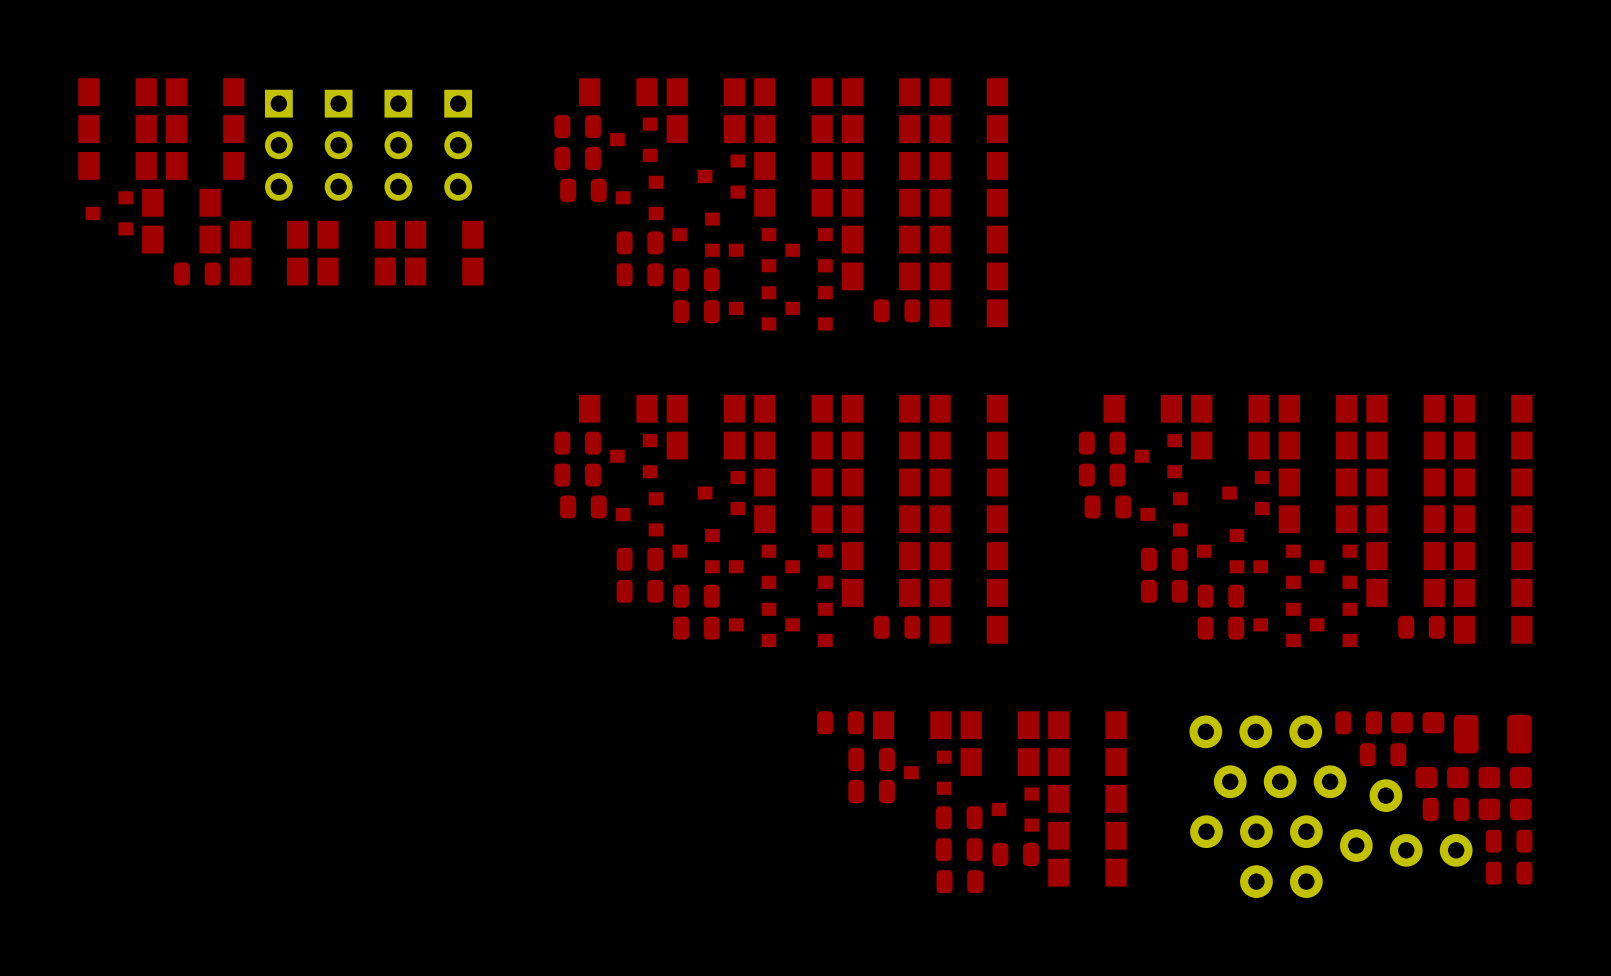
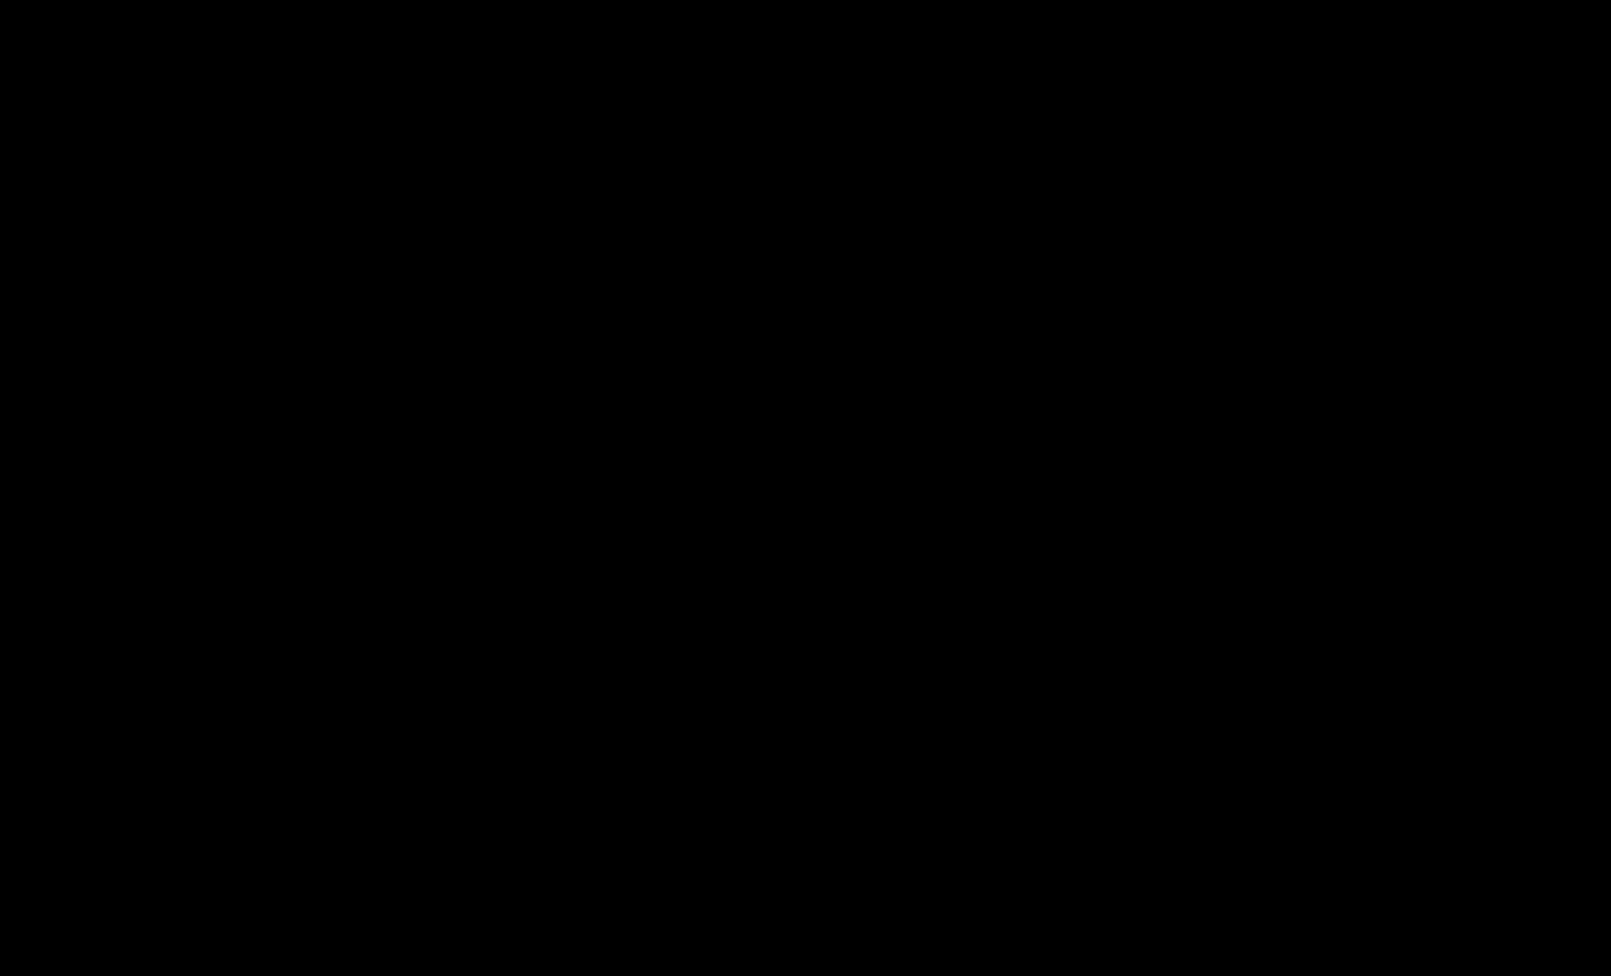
part: (117, 92) -> none
part: (205, 92) -> none
part: (618, 92) -> none
part: (705, 92) -> none
part: (793, 92) -> none
part: (881, 92) -> none
part: (968, 92) -> none
part: (577, 126) -> none
part: (117, 129) -> none
part: (205, 129) -> none
part: (705, 129) -> none
part: (793, 129) -> none
part: (881, 129) -> none
part: (968, 129) -> none
part: (633, 139) -> none
part: (278, 145) -> none
part: (338, 145) -> none
part: (398, 145) -> none
part: (458, 145) -> none
part: (577, 158) -> none
part: (117, 165) -> none
part: (205, 165) -> none
part: (793, 165) -> none
part: (881, 165) -> none
part: (968, 165) -> none
part: (721, 176) -> none
part: (583, 190) -> none
part: (639, 197) -> none
part: (181, 202) -> none
part: (793, 202) -> none
part: (881, 202) -> none
part: (968, 202) -> none
part: (109, 213) -> none
part: (269, 234) -> none
part: (356, 234) -> none
part: (444, 234) -> none
part: (696, 234) -> none
part: (181, 239) -> none
part: (881, 239) -> none
part: (968, 239) -> none
part: (639, 242) -> none
part: (752, 250) -> none
part: (809, 250) -> none
part: (269, 271) -> none
part: (356, 271) -> none
part: (444, 271) -> none
part: (197, 273) -> none
part: (639, 274) -> none
part: (881, 276) -> none
part: (968, 276) -> none
part: (696, 279) -> none
part: (752, 308) -> none
part: (809, 308) -> none
part: (897, 310) -> none
part: (696, 311) -> none
part: (968, 313) -> none
part: (618, 408) -> none
part: (705, 408) -> none
part: (793, 408) -> none
part: (881, 408) -> none
part: (968, 408) -> none
part: (1142, 408) -> none
part: (1230, 408) -> none
part: (1317, 408) -> none
part: (1405, 408) -> none
part: (1493, 408) -> none
part: (577, 443) -> none
part: (1102, 443) -> none
part: (705, 445) -> none
part: (793, 445) -> none
part: (881, 445) -> none
part: (968, 445) -> none
part: (1230, 445) -> none
part: (1317, 445) -> none
part: (1405, 445) -> none
part: (1493, 445) -> none
part: (633, 456) -> none
part: (1158, 456) -> none
part: (577, 475) -> none
part: (1102, 475) -> none
part: (793, 482) -> none
part: (881, 482) -> none
part: (968, 482) -> none
part: (1317, 482) -> none
part: (1405, 482) -> none
part: (1493, 482) -> none
part: (721, 493) -> none
part: (1245, 493) -> none
part: (583, 506) -> none
part: (1107, 506) -> none
part: (639, 514) -> none
part: (1164, 514) -> none
part: (793, 519) -> none
part: (881, 519) -> none
part: (968, 519) -> none
part: (1317, 519) -> none
part: (1405, 519) -> none
part: (1493, 519) -> none
part: (696, 551) -> none
part: (1220, 551) -> none
part: (881, 556) -> none
part: (968, 556) -> none
part: (1405, 556) -> none
part: (1493, 556) -> none
part: (639, 559) -> none
part: (1164, 559) -> none
part: (752, 566) -> none
part: (809, 566) -> none
part: (1277, 566) -> none
part: (1333, 566) -> none
part: (639, 591) -> none
part: (1164, 591) -> none
part: (881, 592) -> none
part: (968, 592) -> none
part: (1405, 592) -> none
part: (1493, 592) -> none
part: (696, 596) -> none
part: (1220, 596) -> none
part: (752, 624) -> none
part: (809, 624) -> none
part: (1277, 624) -> none
part: (1333, 624) -> none
part: (897, 627) -> none
part: (1421, 627) -> none
part: (696, 628) -> none
part: (1220, 628) -> none
part: (968, 629) -> none
part: (1493, 629) -> none
part: (840, 722) -> none
part: (1358, 722) -> none
part: (1417, 722) -> none
part: (912, 725) -> none
part: (999, 725) -> none
part: (1087, 725) -> none
part: (1205, 731) -> none
part: (1255, 731) -> none
part: (1305, 731) -> none
part: (1492, 734) -> none
part: (1383, 754) -> none
part: (871, 759) -> none
part: (999, 762) -> none
part: (1087, 762) -> none
part: (927, 772) -> none
part: (1442, 777) -> none
part: (1505, 777) -> none
part: (1230, 781) -> none
part: (1280, 781) -> none
part: (1330, 781) -> none
part: (871, 791) -> none
part: (1385, 795) -> none
part: (1087, 798) -> none
part: (1015, 809) -> none
part: (1446, 809) -> none
part: (1505, 809) -> none
part: (959, 817) -> none
part: (1206, 831) -> none
part: (1256, 831) -> none
part: (1306, 831) -> none
part: (1087, 835) -> none
part: (1509, 841) -> none
part: (1356, 845) -> none
part: (959, 849) -> none
part: (1406, 850) -> none
part: (1456, 850) -> none
part: (1015, 854) -> none
part: (1087, 872) -> none
part: (1509, 873) -> none
part: (959, 881) -> none
part: (1256, 881) -> none
part: (1306, 881) -> none

